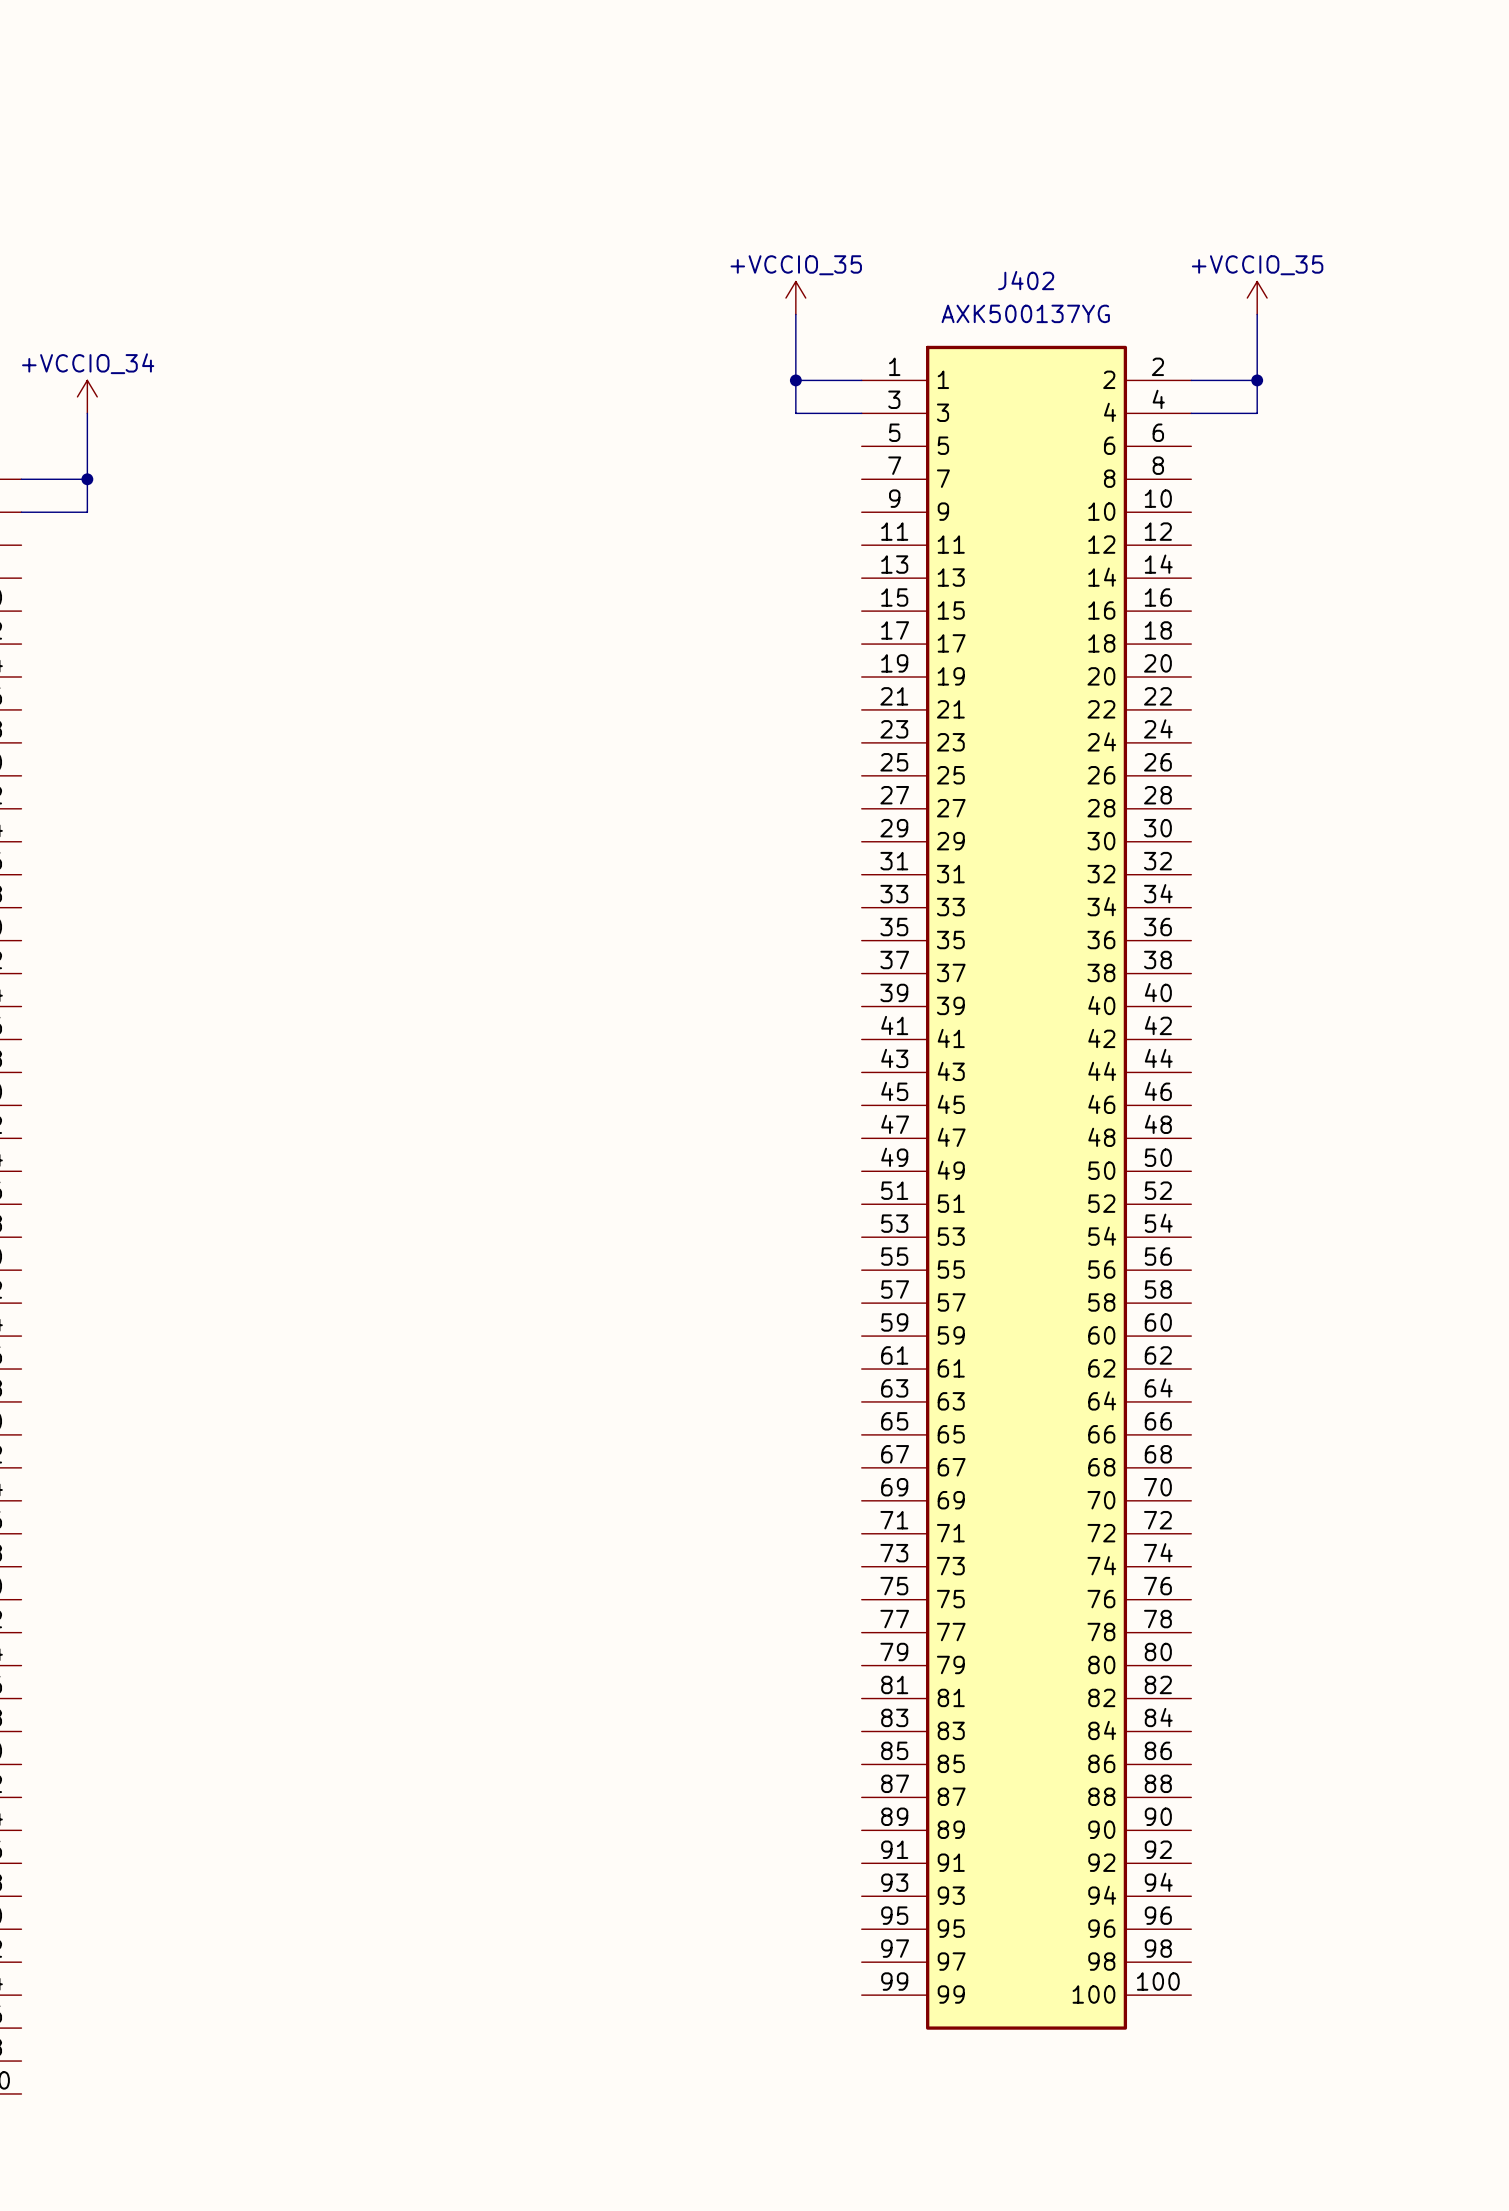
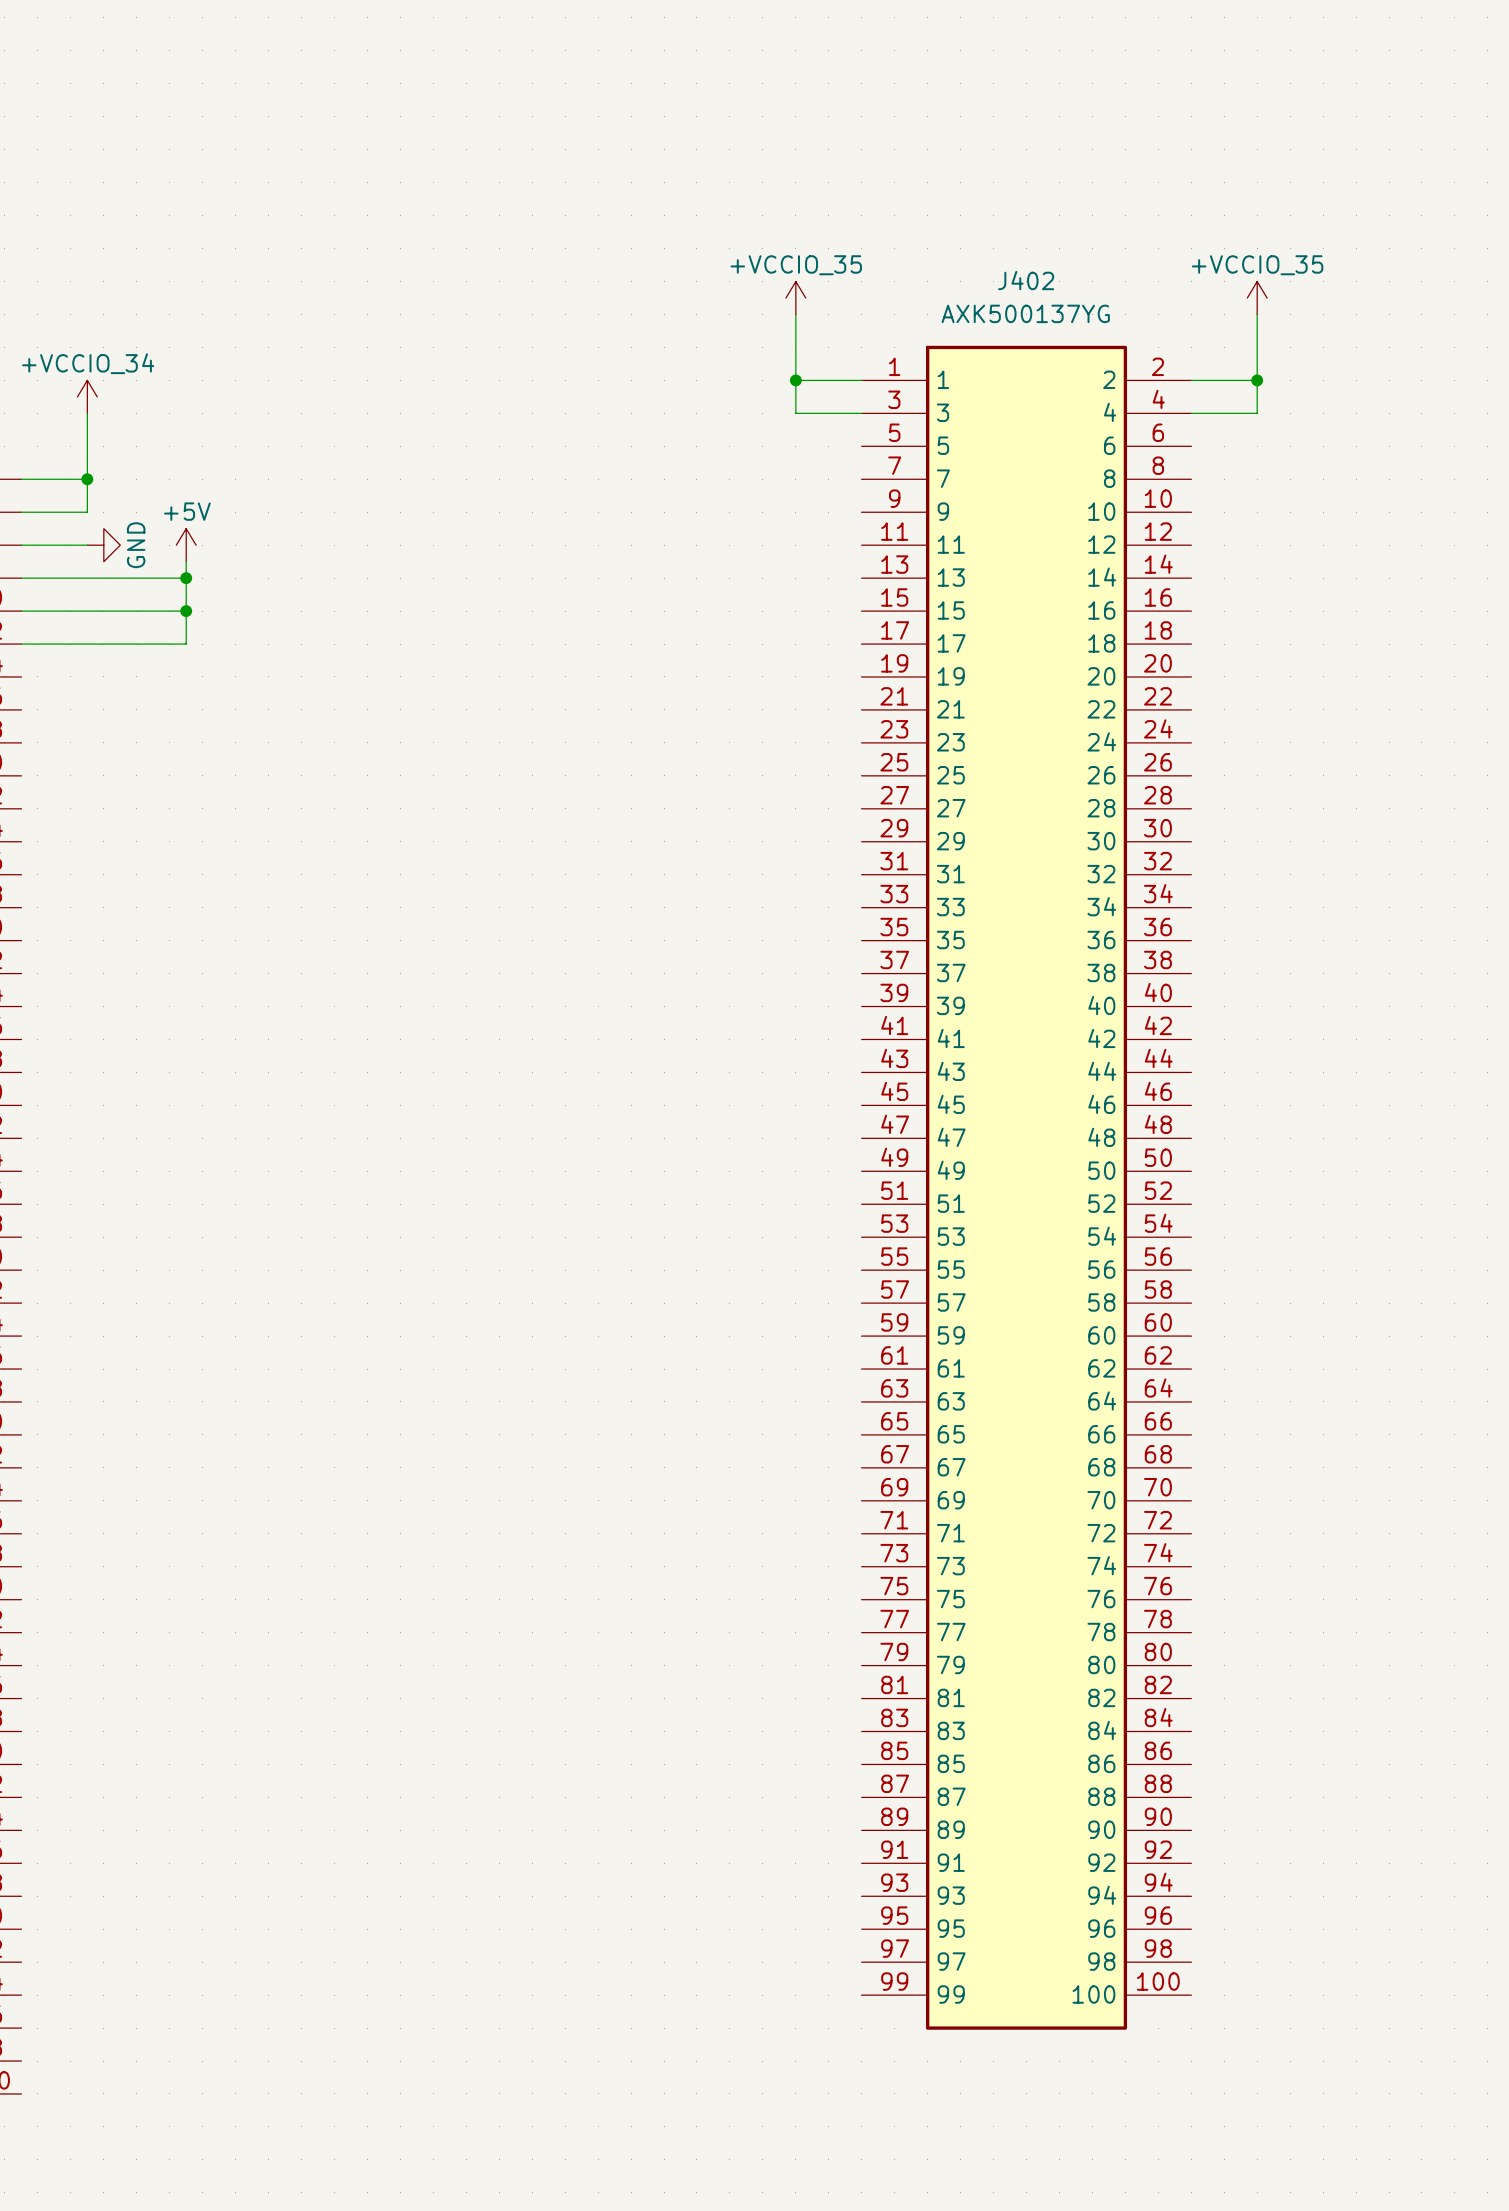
wire: none -> (21, 545) (87, 545)
power symbol: none -> GND (103, 545)
power symbol: none -> +5V (186, 545)
wire: none -> (186, 561) (186, 644) (21, 644)
wire: none -> (21, 578) (186, 578)
junction: none -> (186, 578)
wire: none -> (21, 611) (186, 611)
junction: none -> (186, 611)

